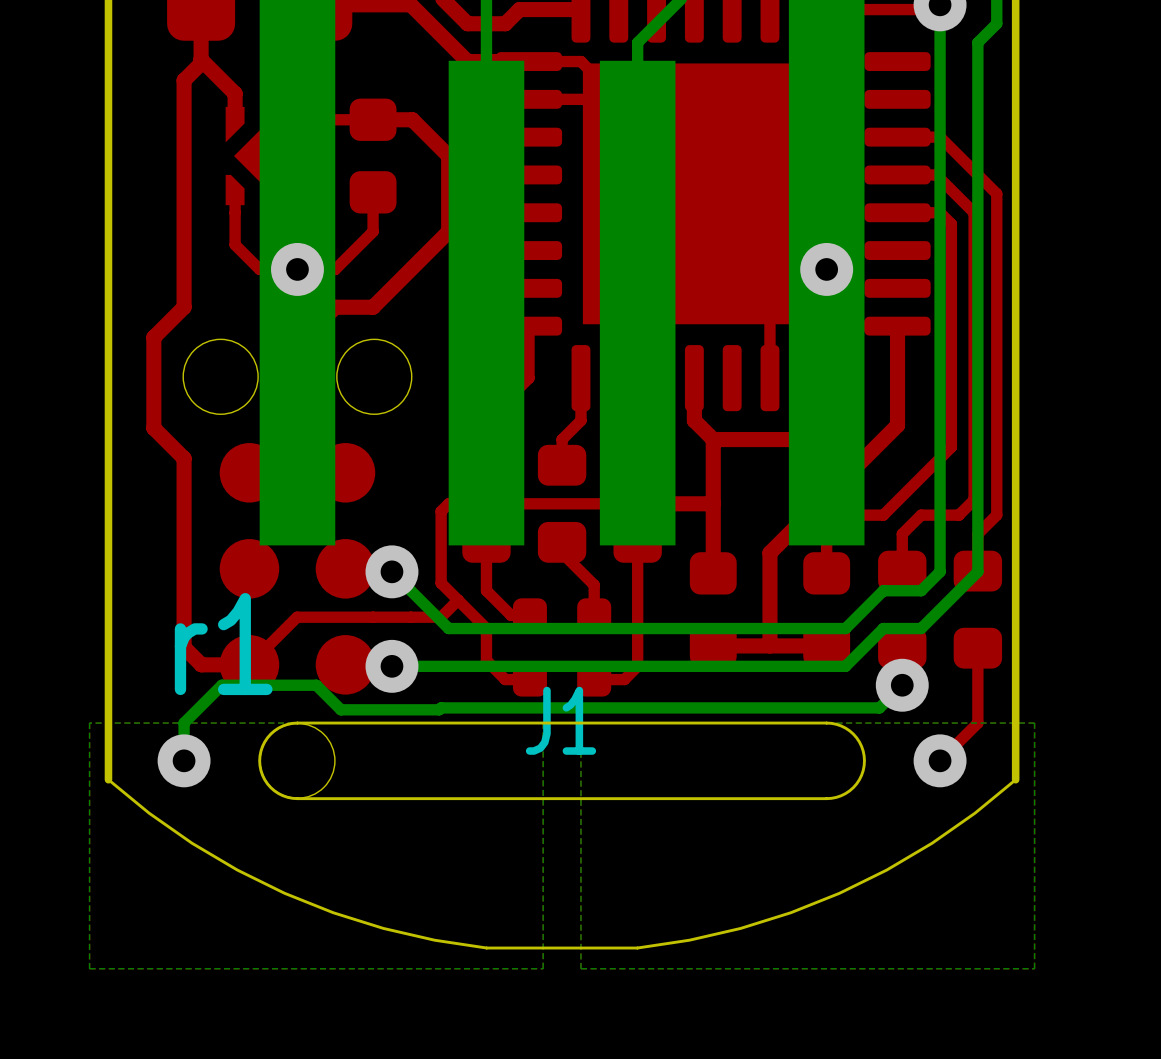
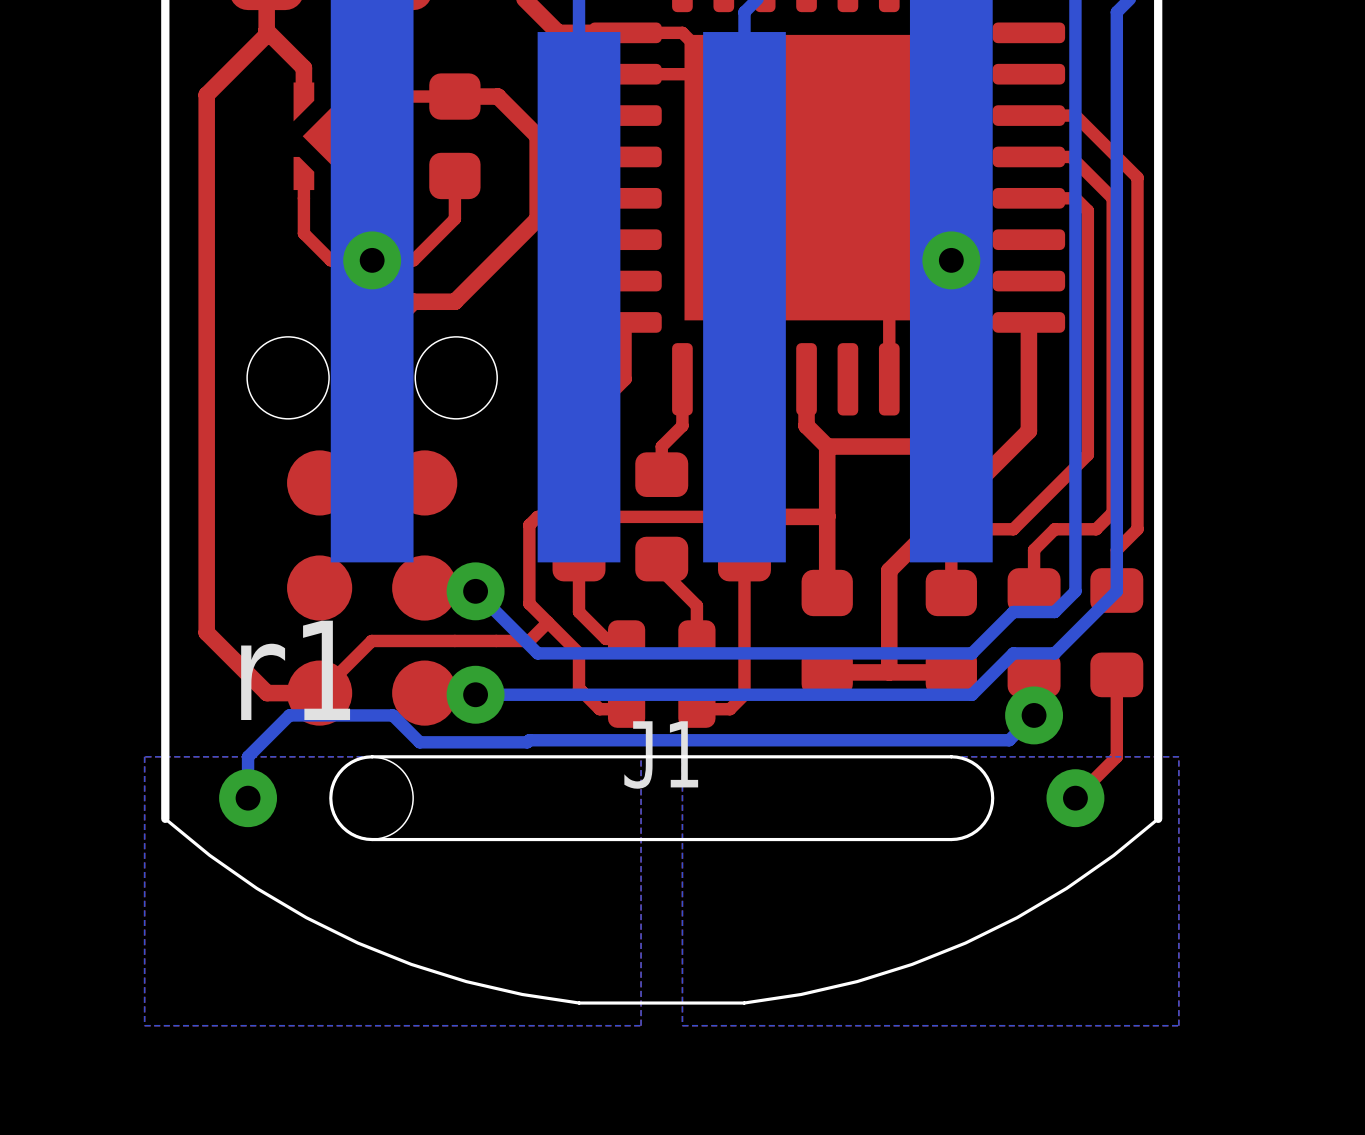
top track: (184, 80) (184, 307) (153, 337) (153, 428) (184, 458) (184, 647) -> (248, 53) (206, 94) (206, 632) (248, 674)

